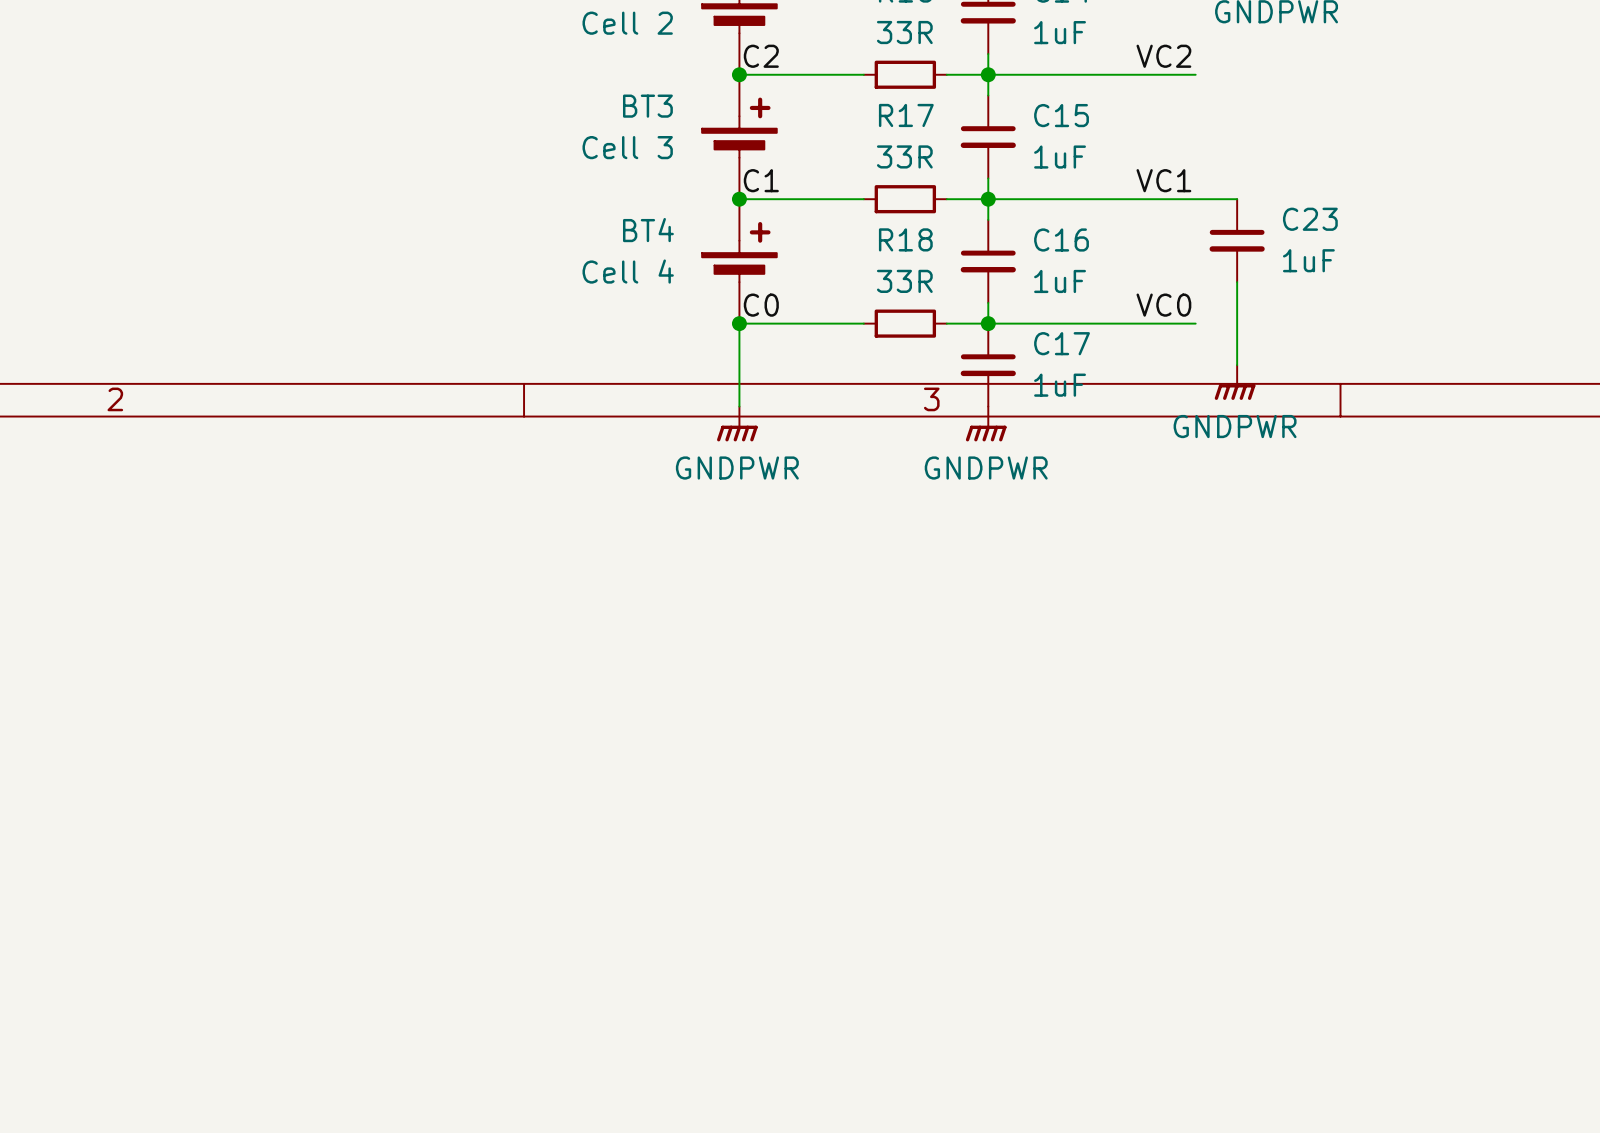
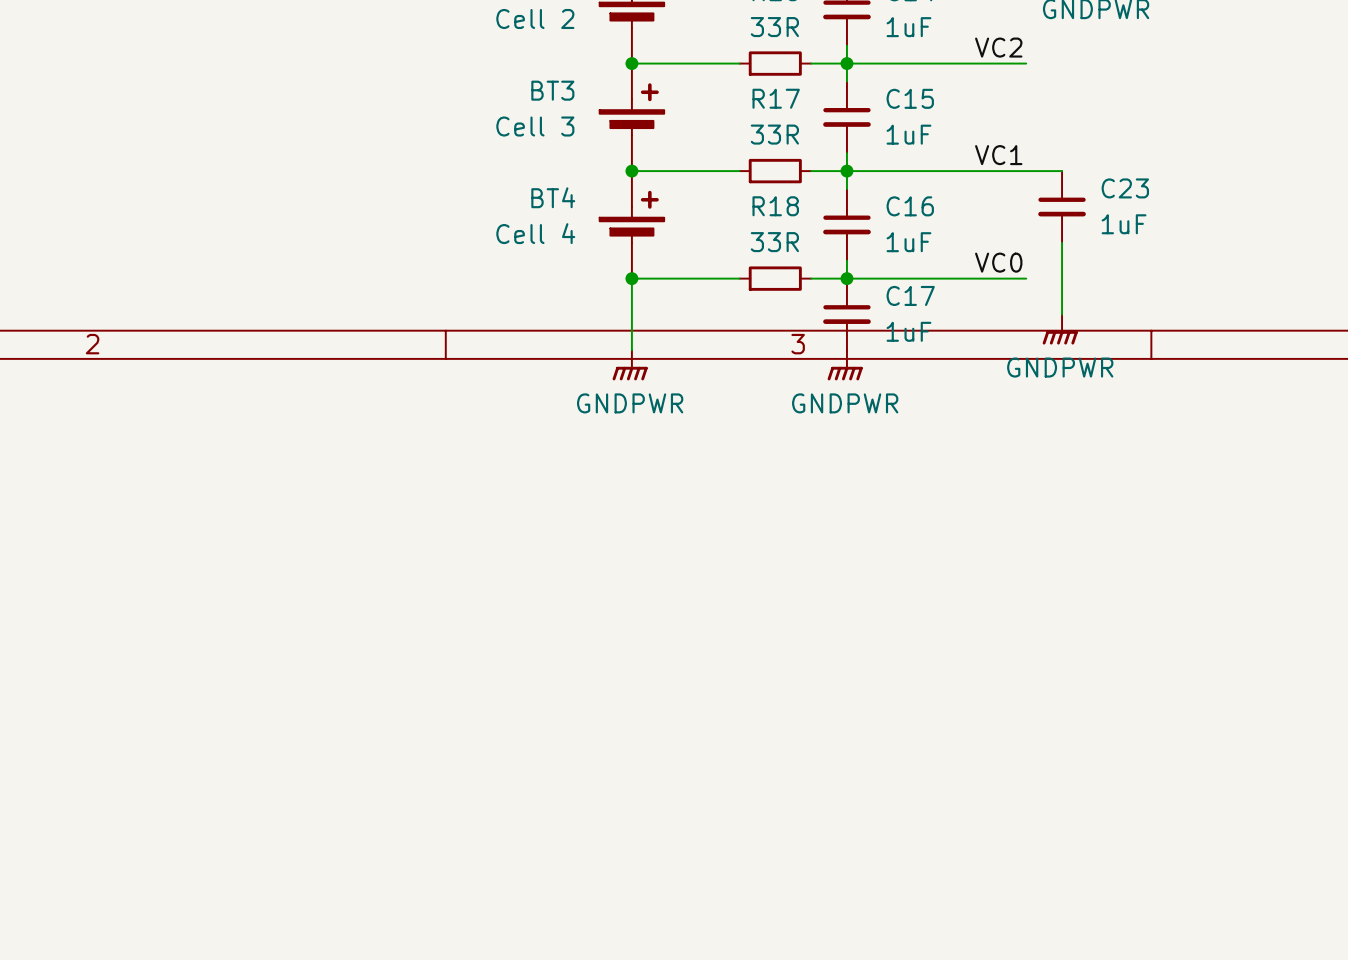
label: C2 (761, 56) -> none
label: C1 (761, 180) -> none
label: C0 (761, 305) -> none

